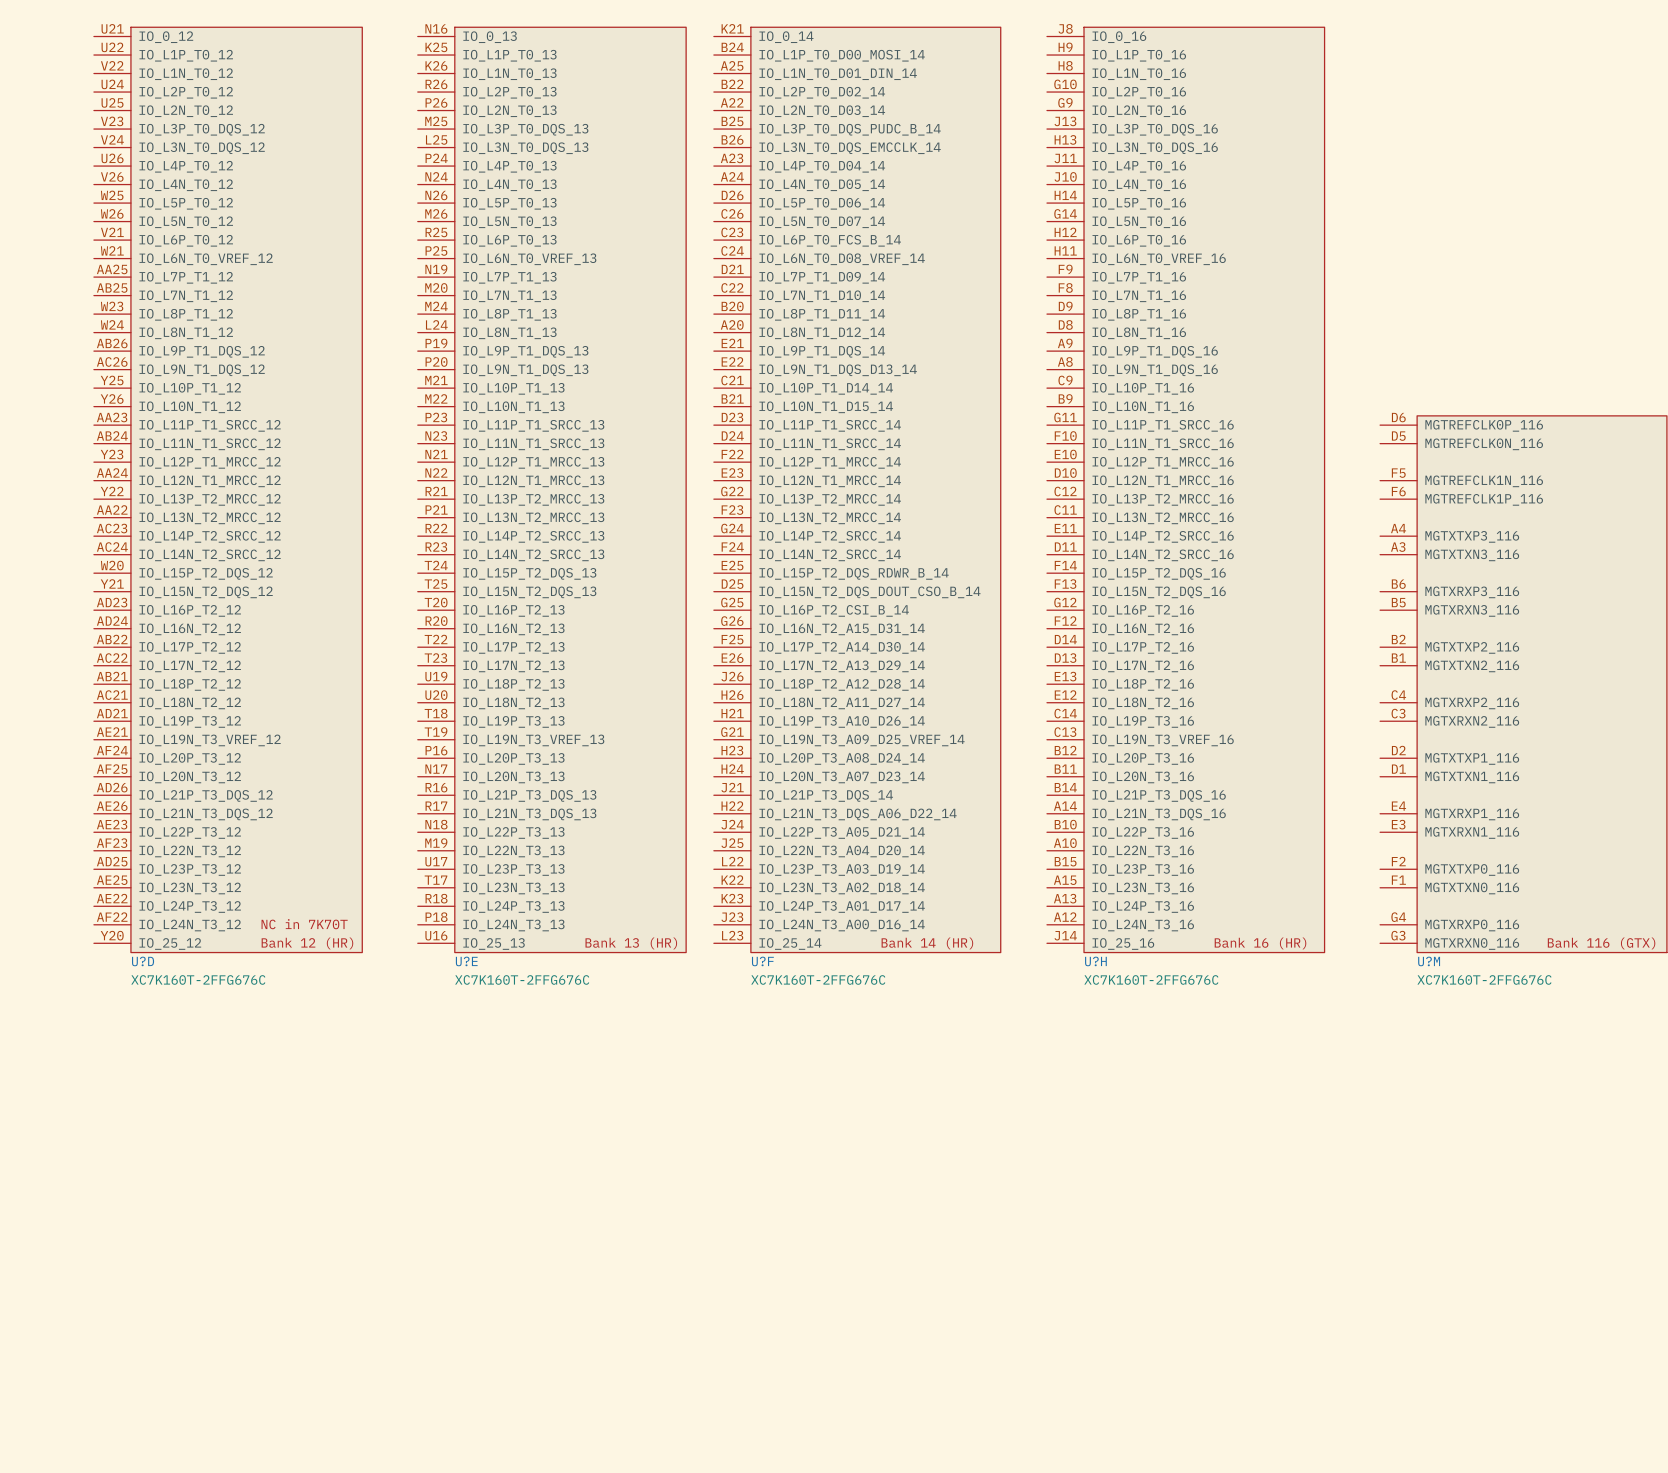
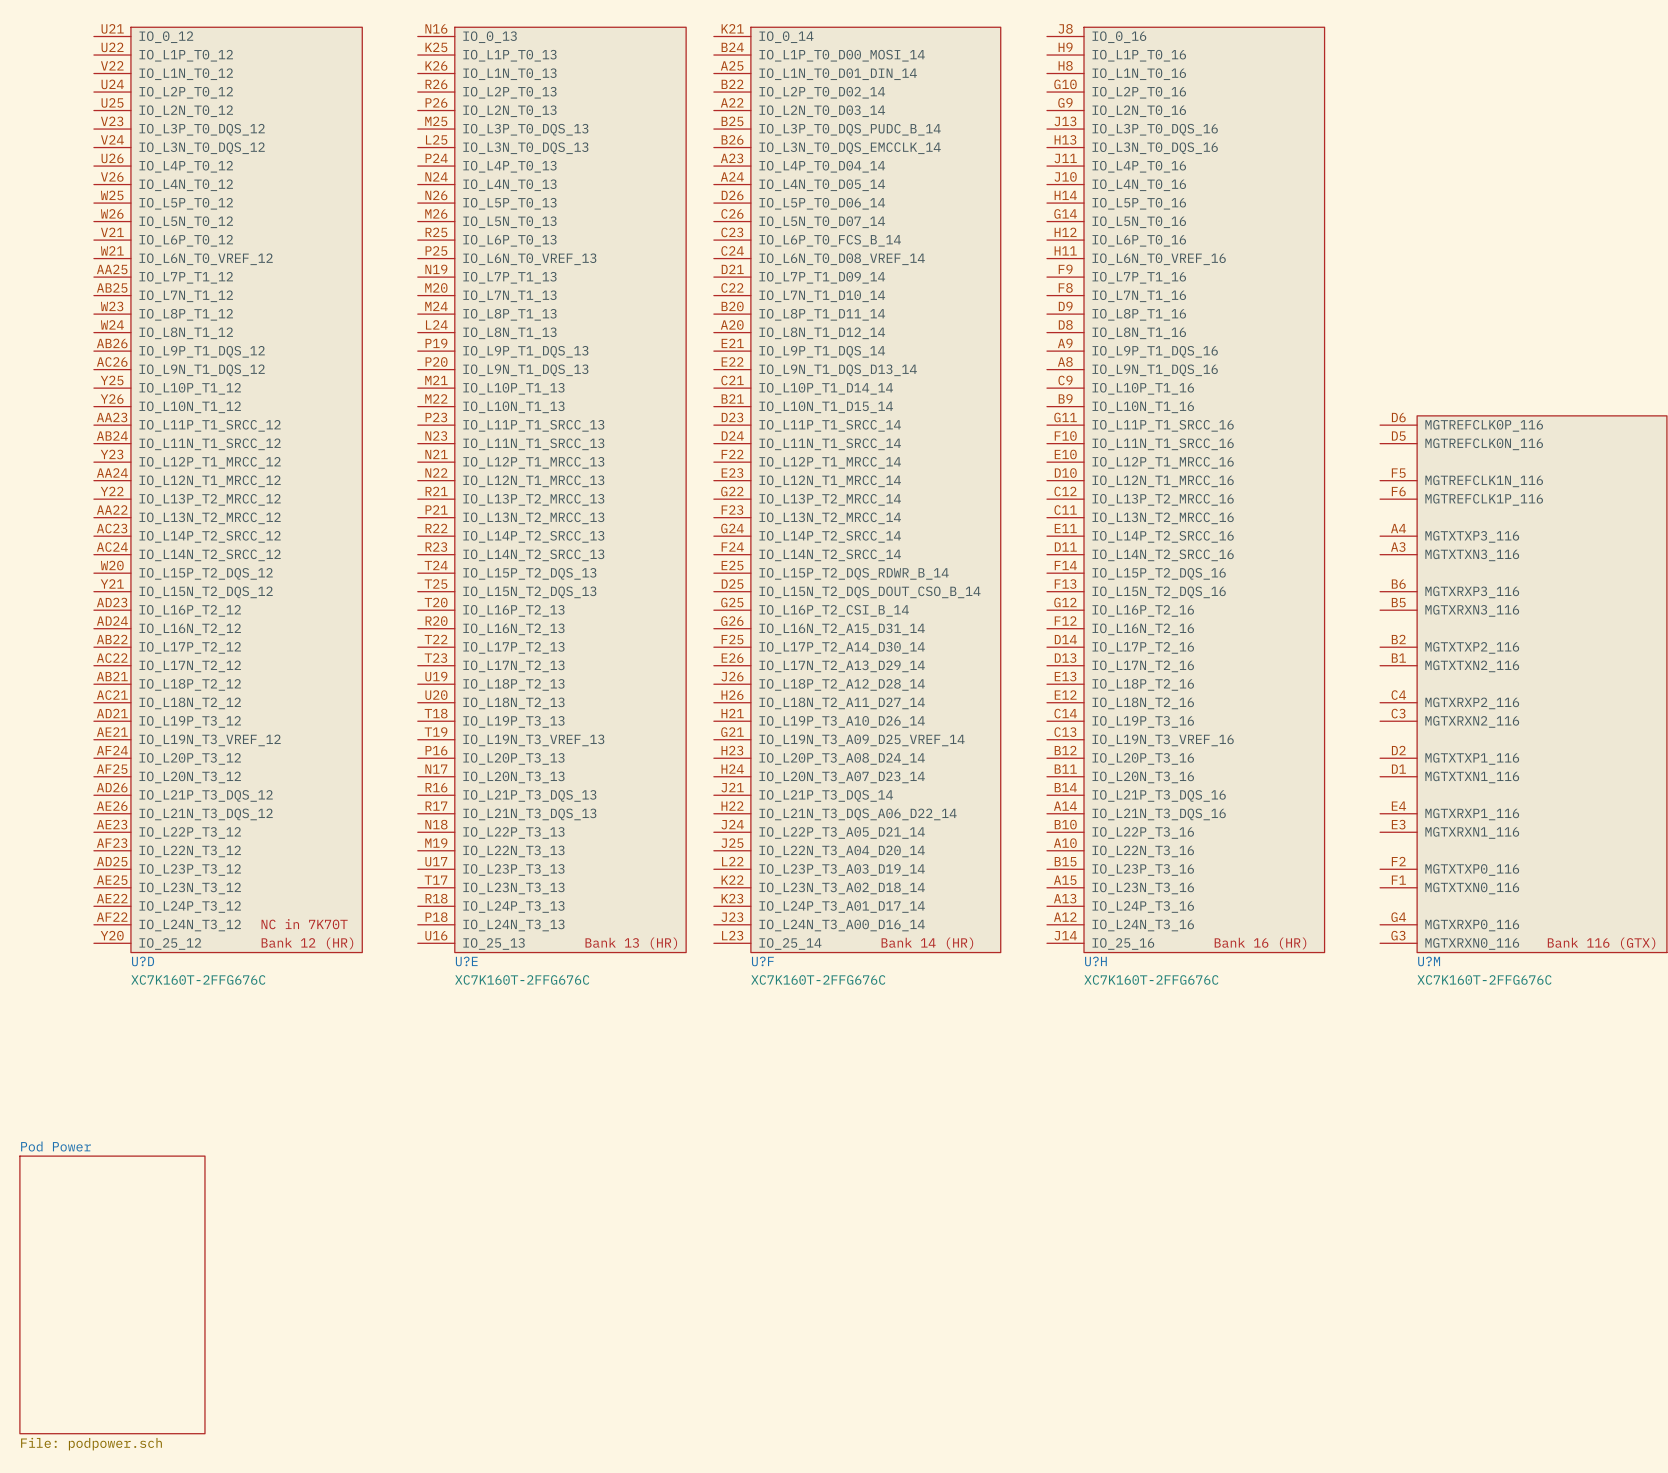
sheet Pod Power: none -> File: podpower.sch (112, 1294)

